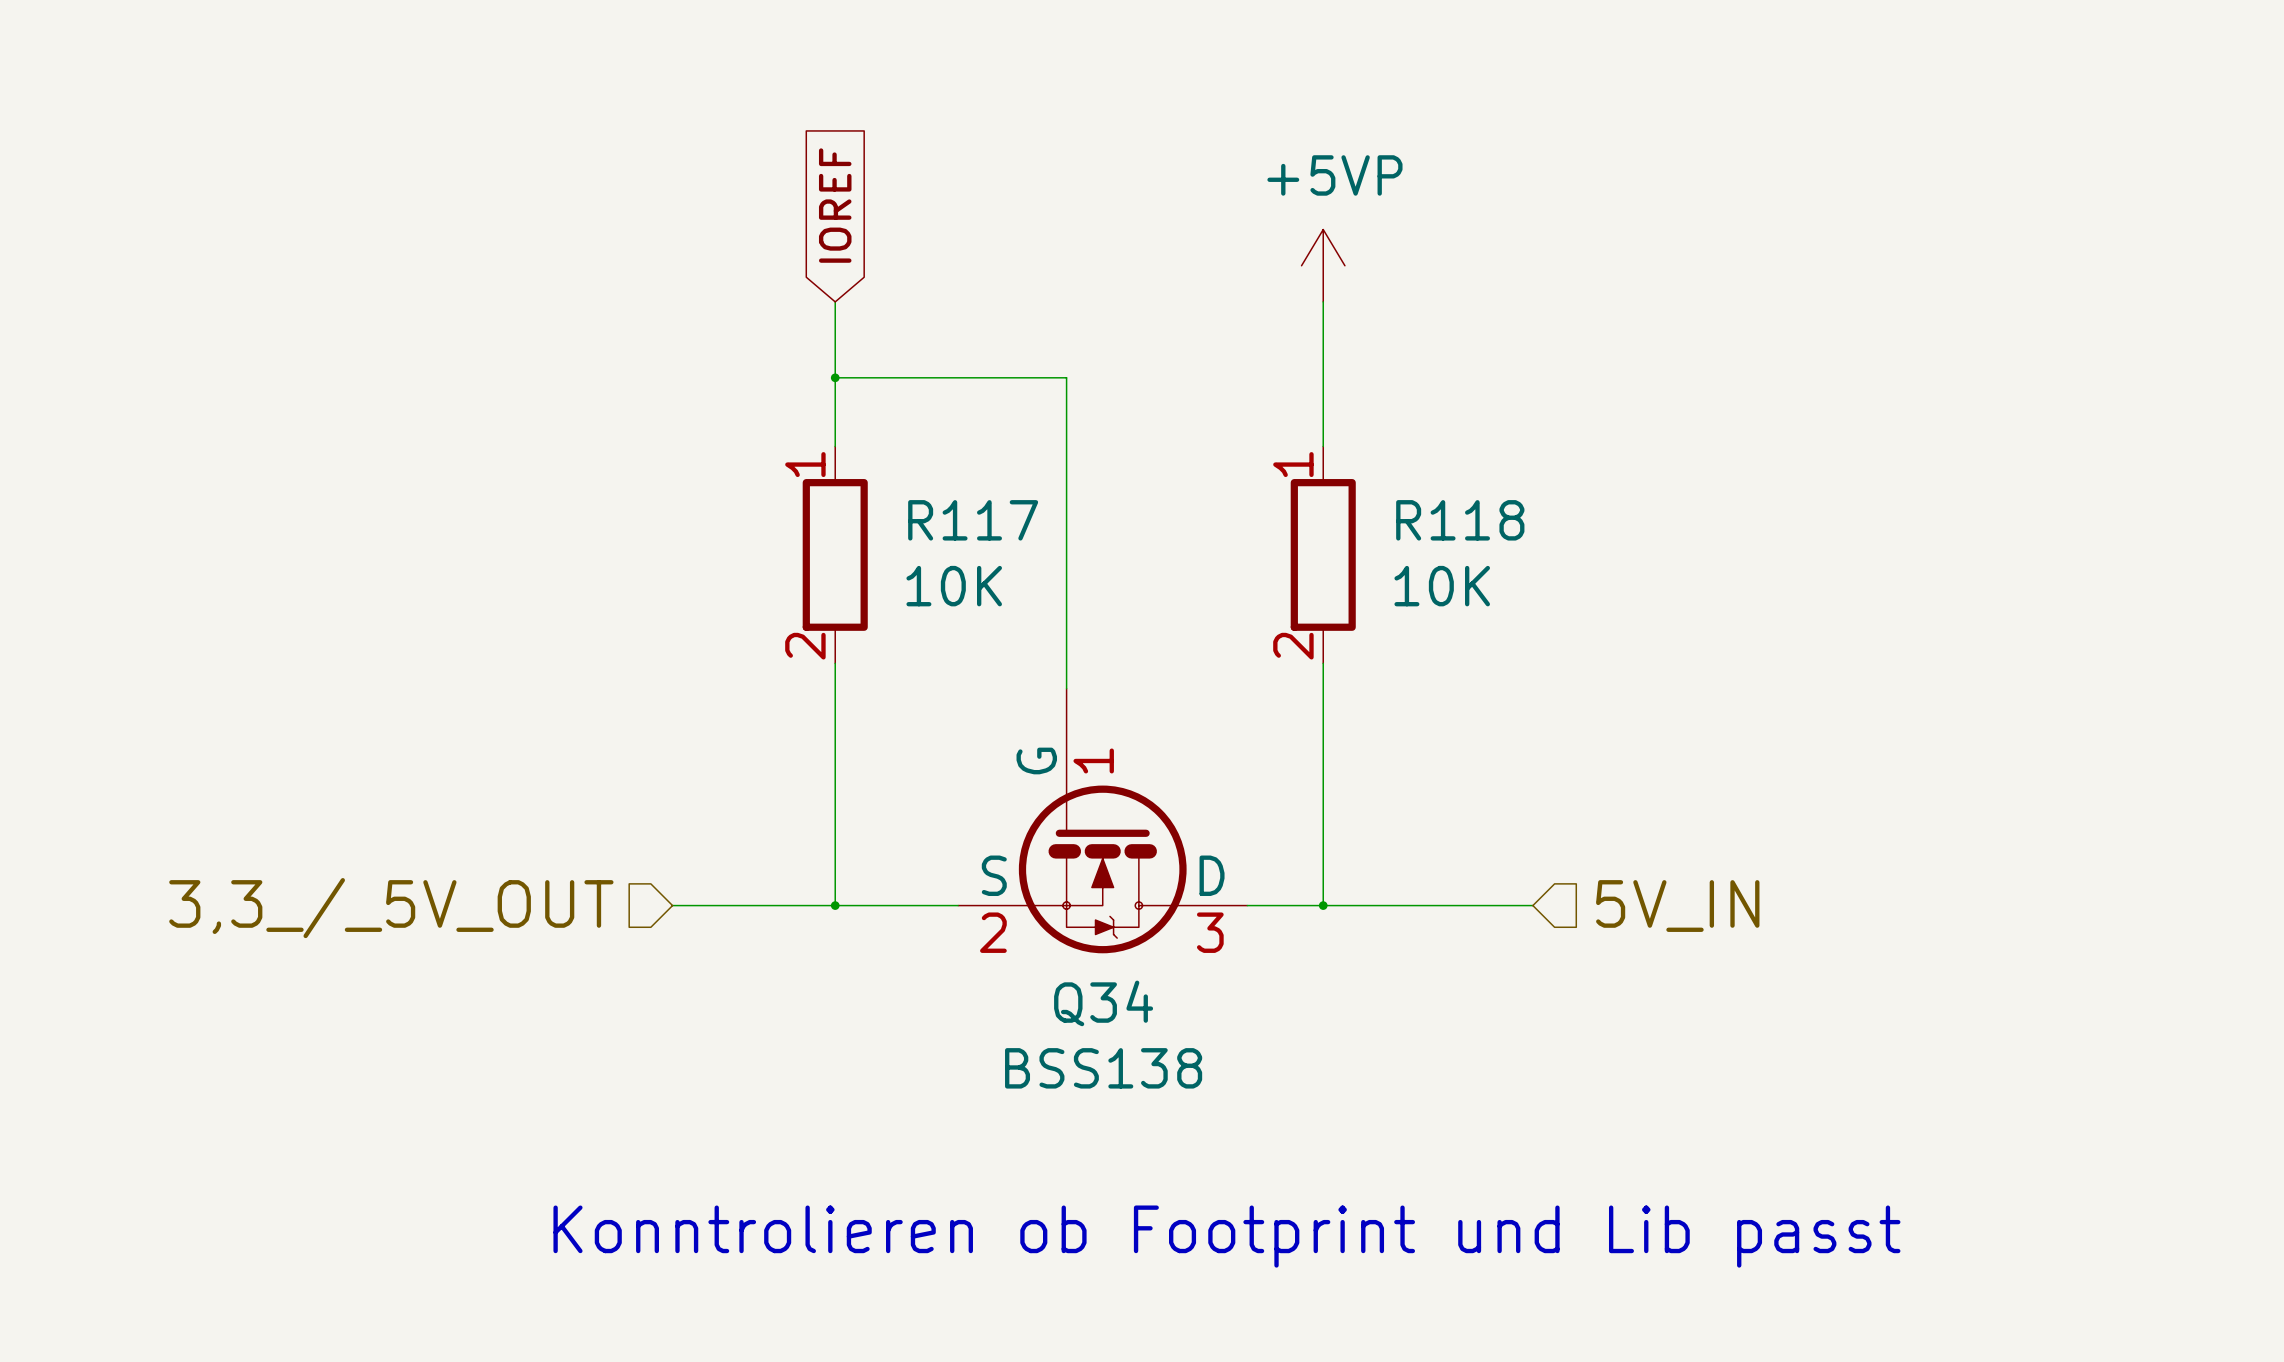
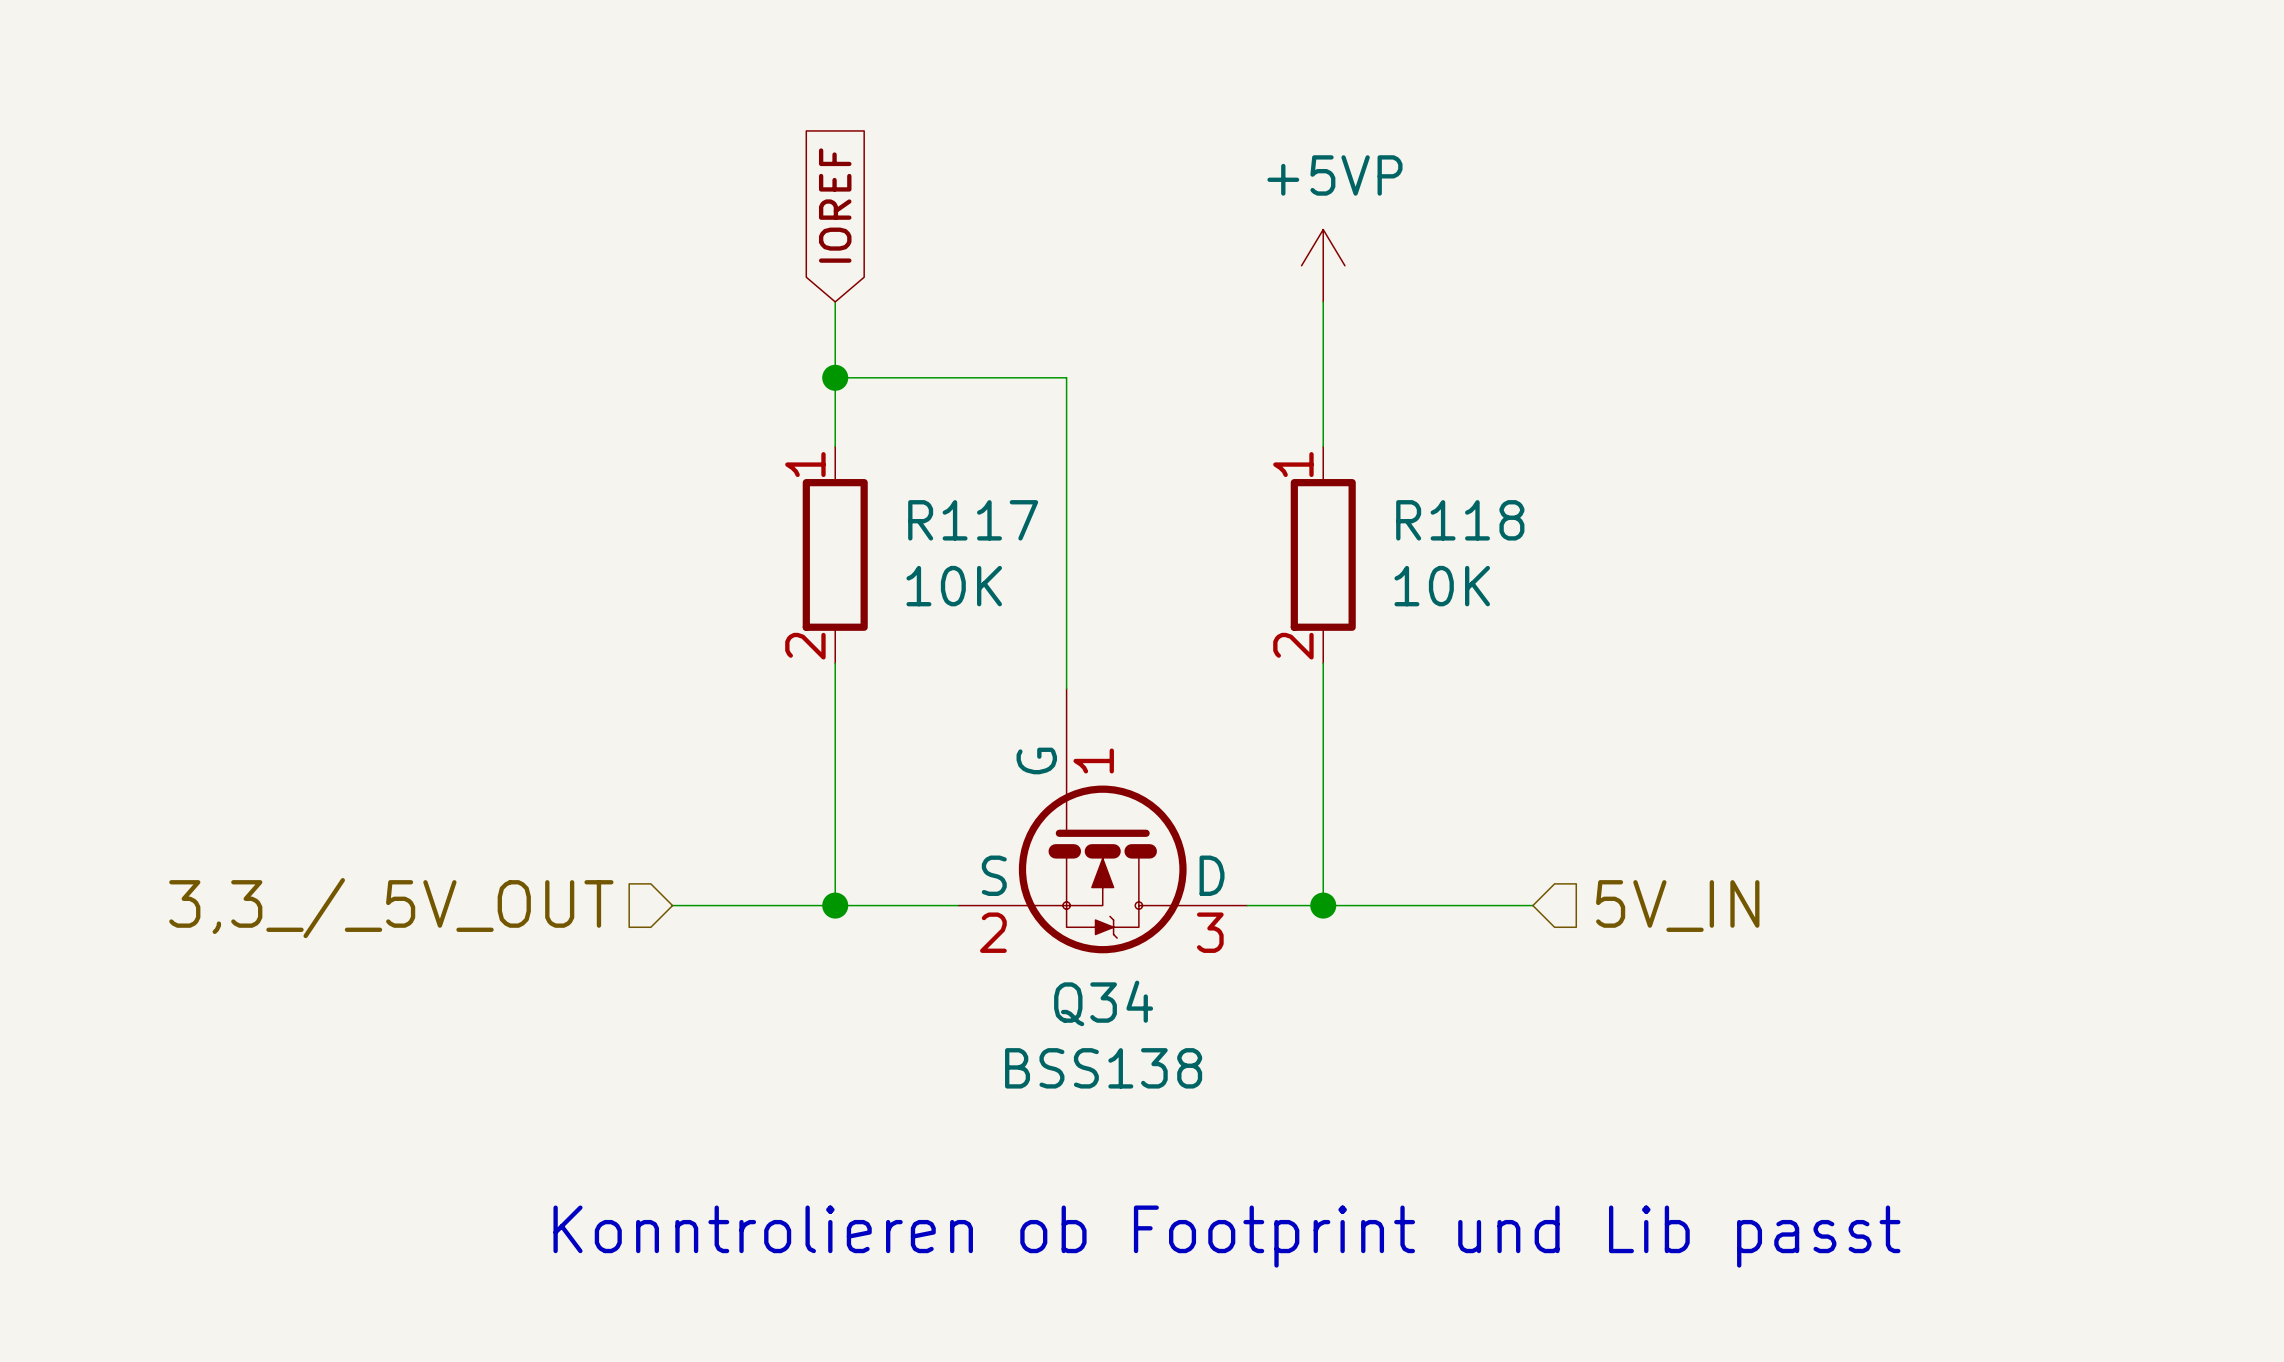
junction size: [830, 373, 840, 383] -> [822, 364, 849, 391]
junction size: [830, 901, 840, 910] -> [822, 892, 849, 919]
junction size: [1318, 901, 1328, 910] -> [1310, 892, 1337, 919]

